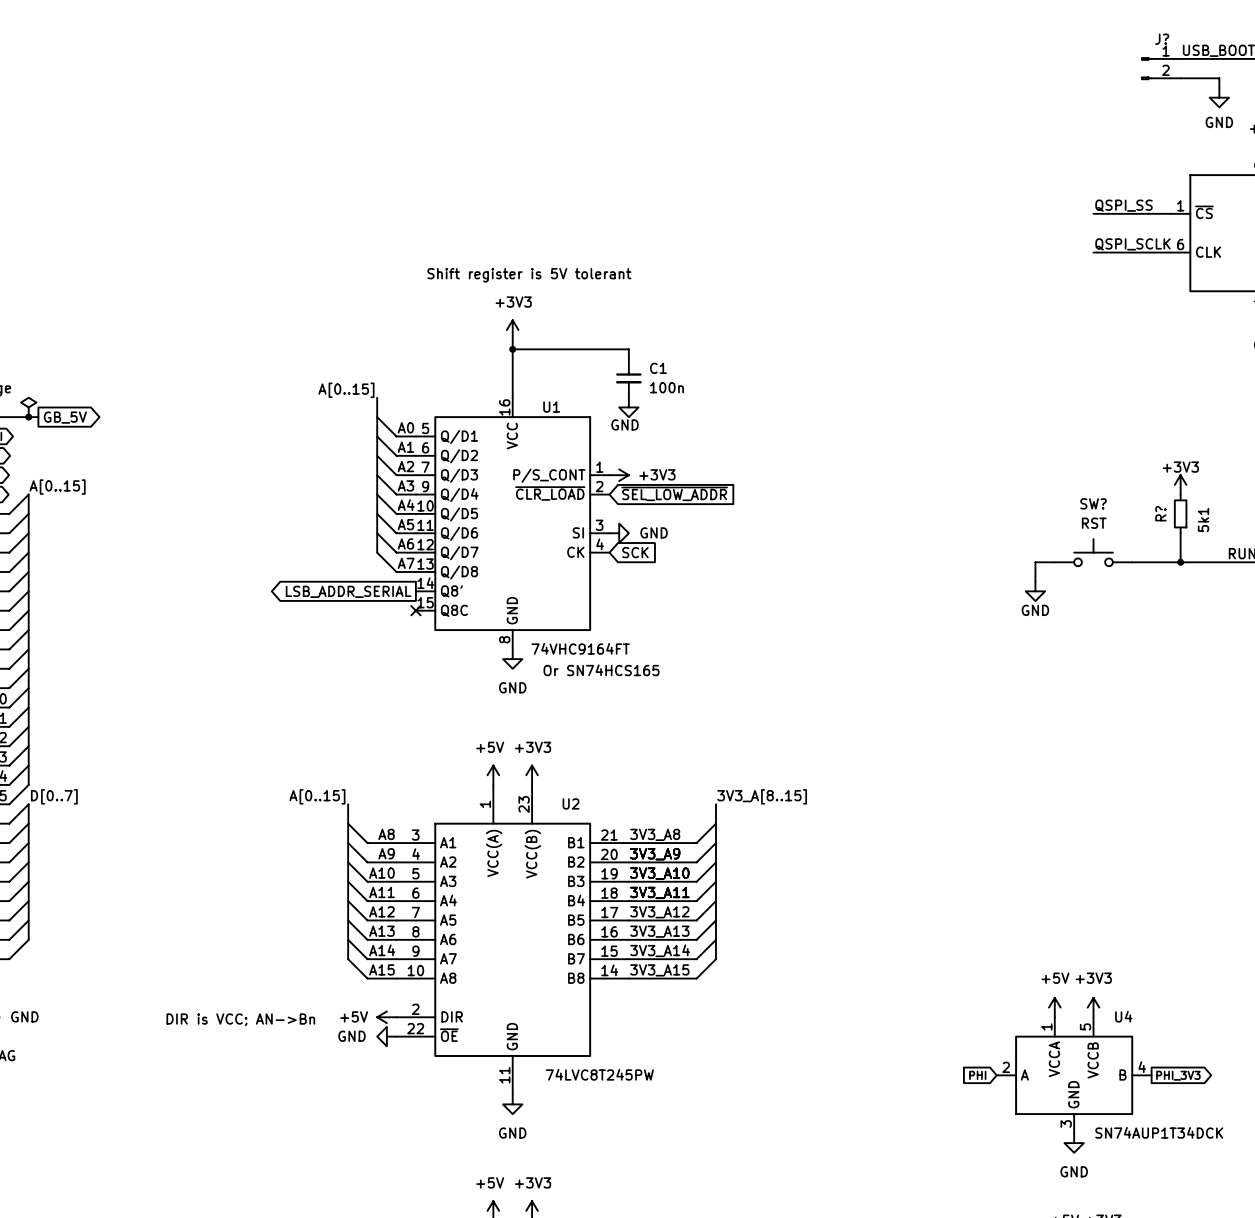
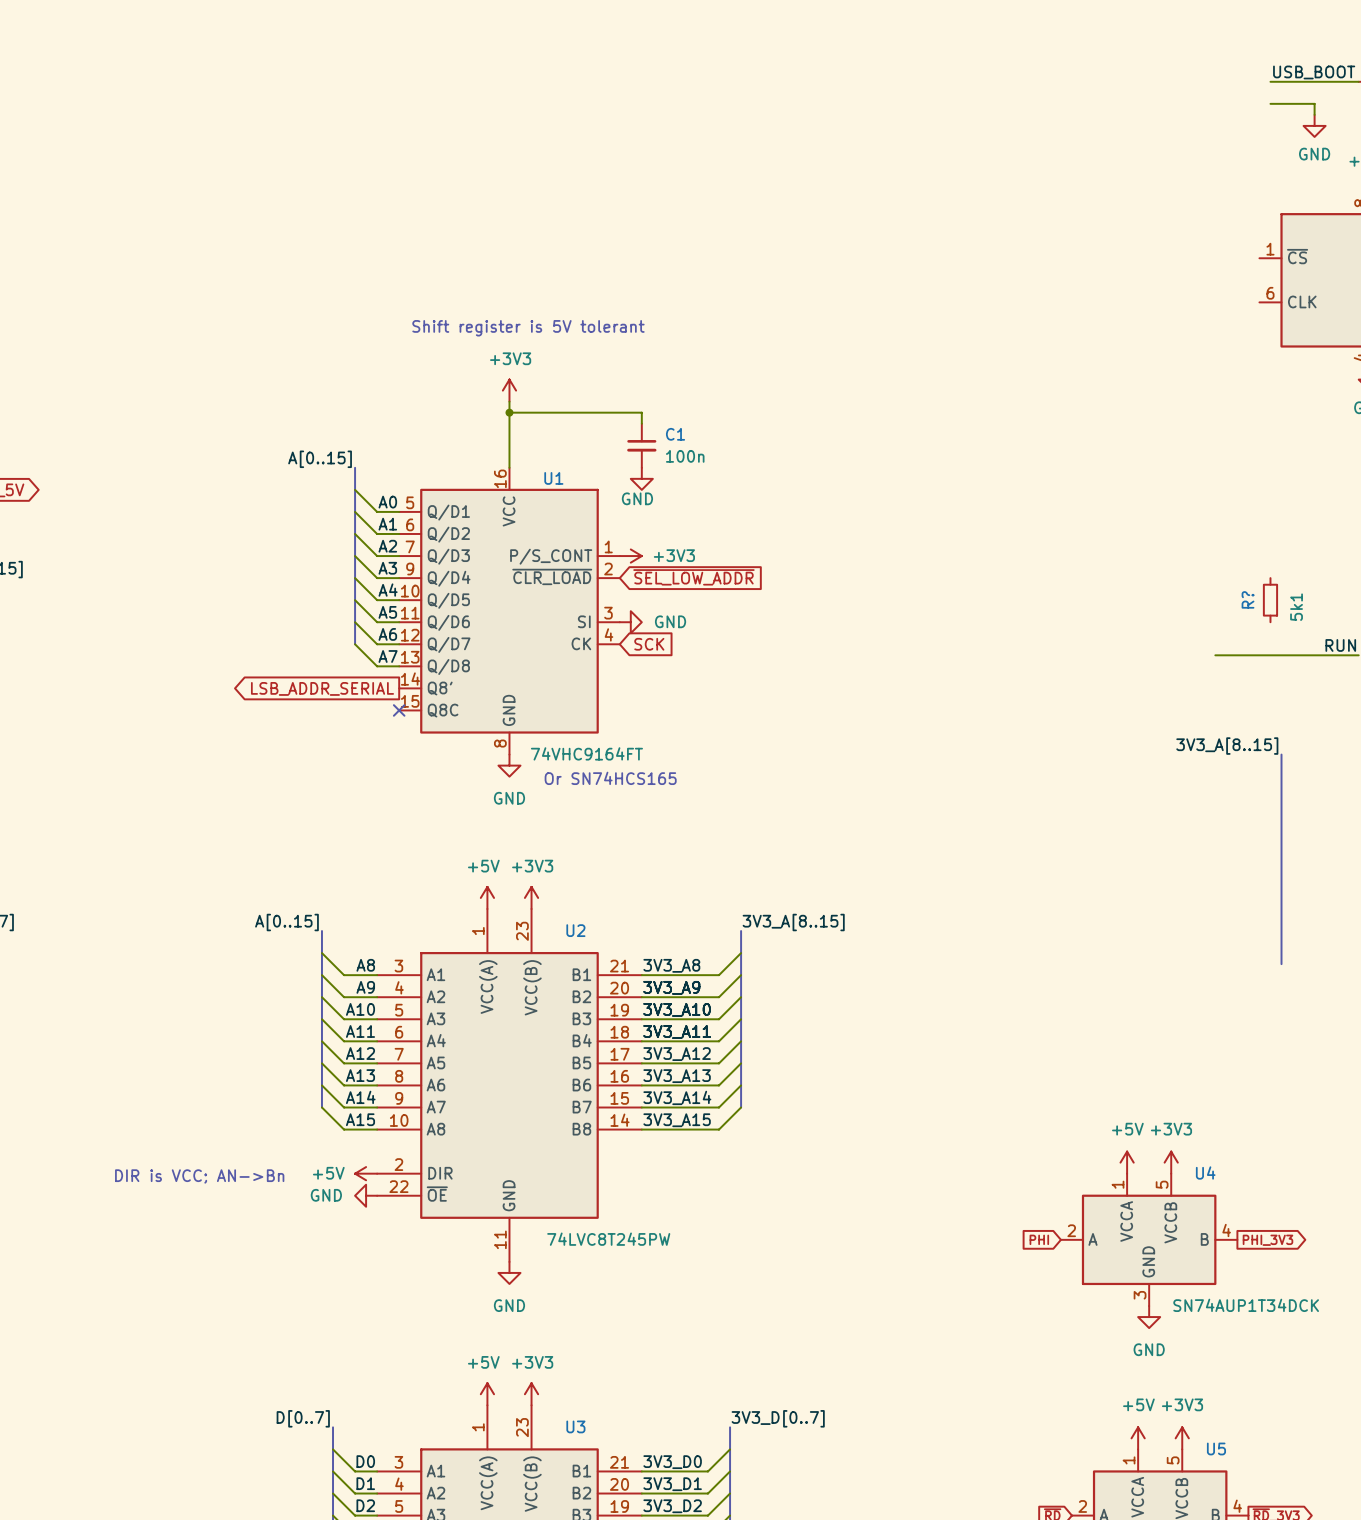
J?: (1160, 68) -> none
label: QSPI_SS (1124, 205) -> none
wire: (1093, 213) (1170, 213) -> none
label: QSPI_SCLK (1133, 244) -> none
wire: (1093, 252) (1170, 252) -> none
power symbol: +3V3 (1180, 484) -> none
wire: (1180, 533) (1180, 562) -> none
SW?: RST (1093, 552) -> none
wire: (1054, 562) (1035, 562) (1035, 581) -> none
junction: (1180, 562) -> none
power symbol: GND (1035, 591) -> none
label: none -> 3V3_A[8..15] (1227, 746)
bus: none -> (1281, 754) (1281, 964)

